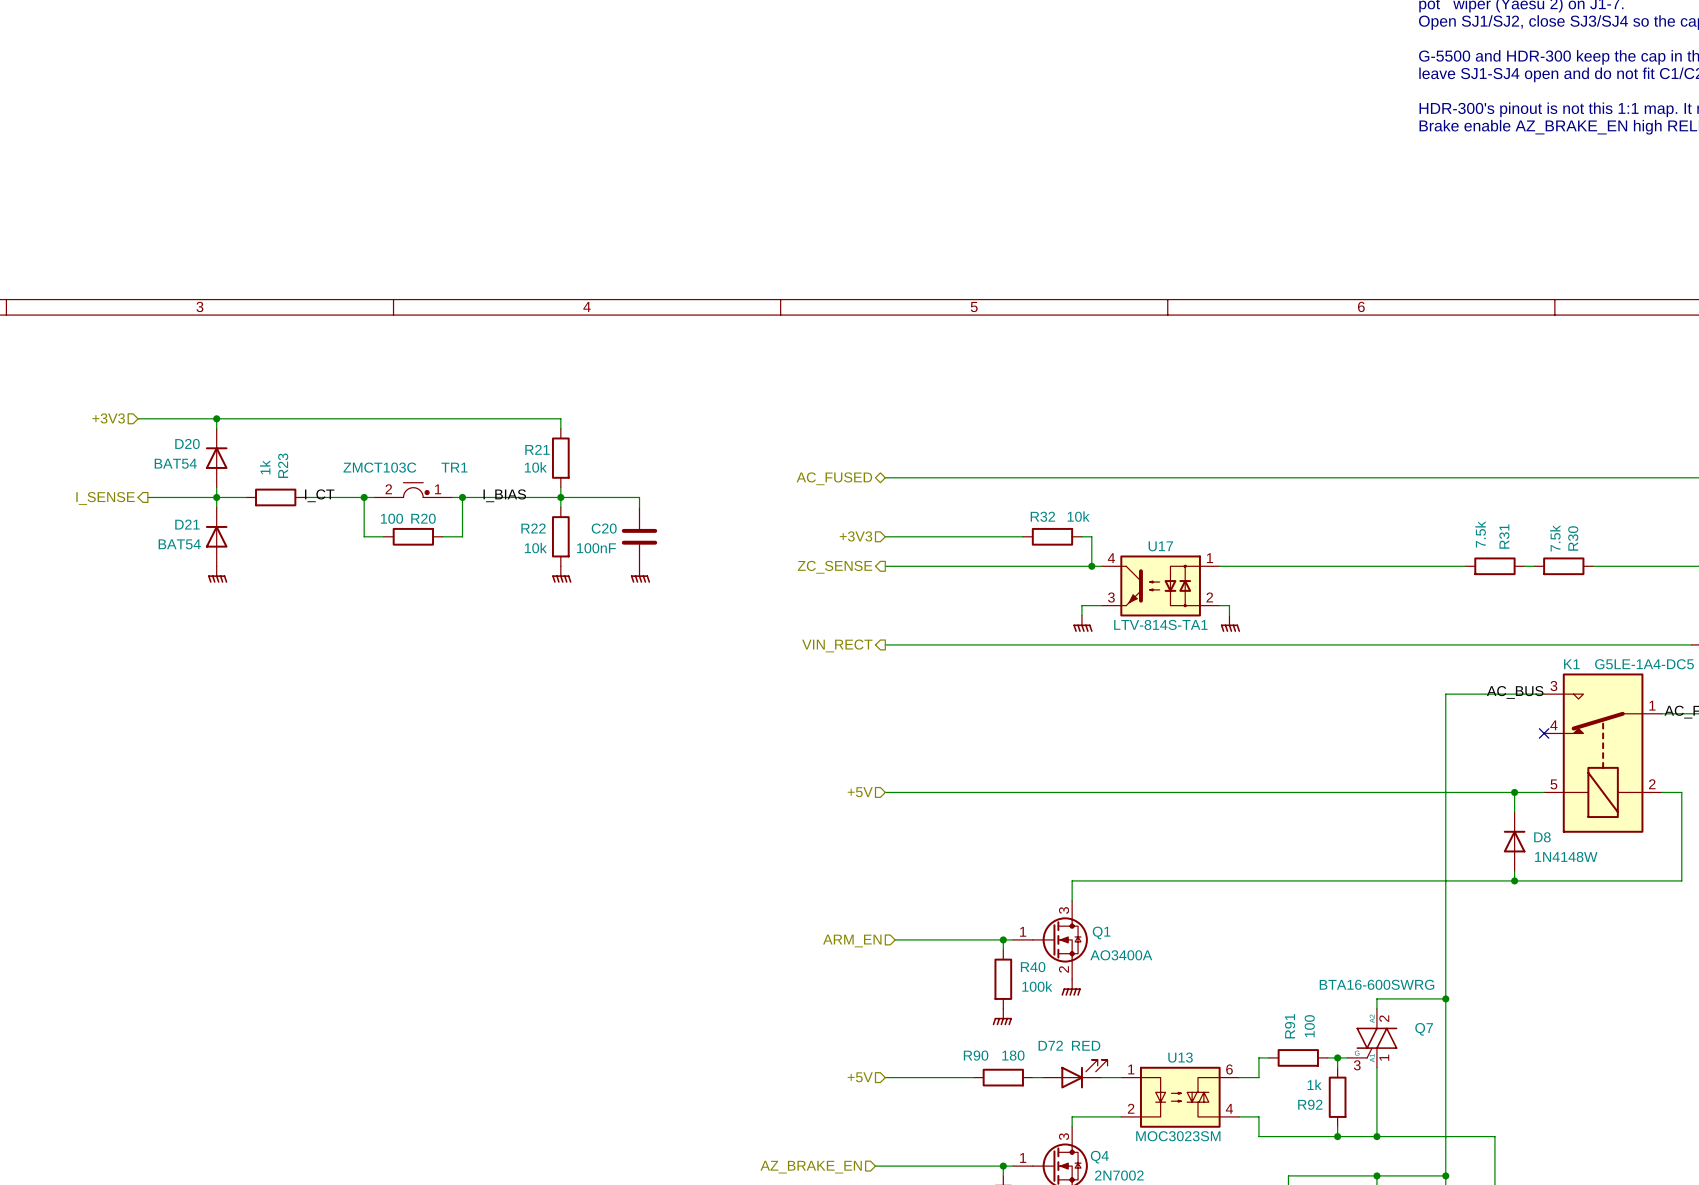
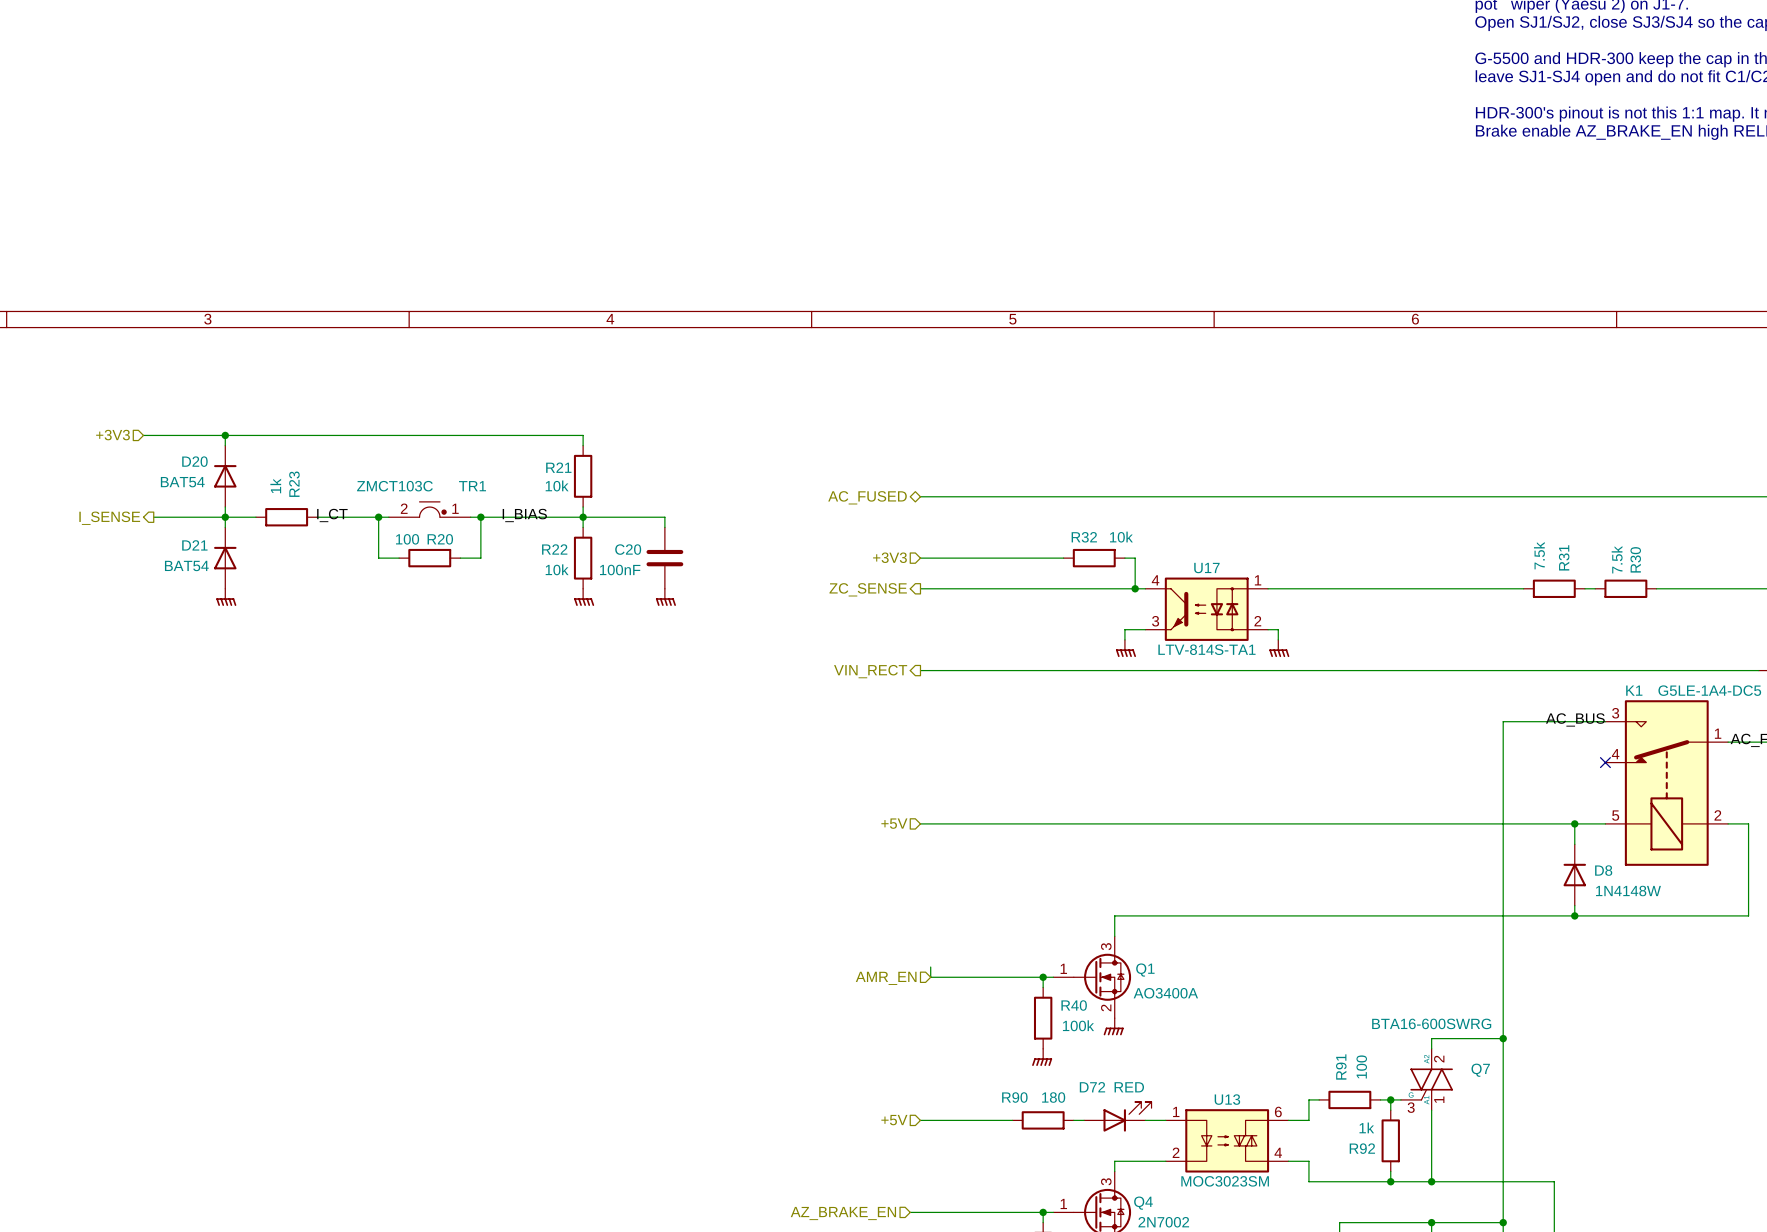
wire: none -> (930, 967) (930, 977)
hierarchical label: ARM_EN (852, 940) -> AMR_EN (886, 978)

